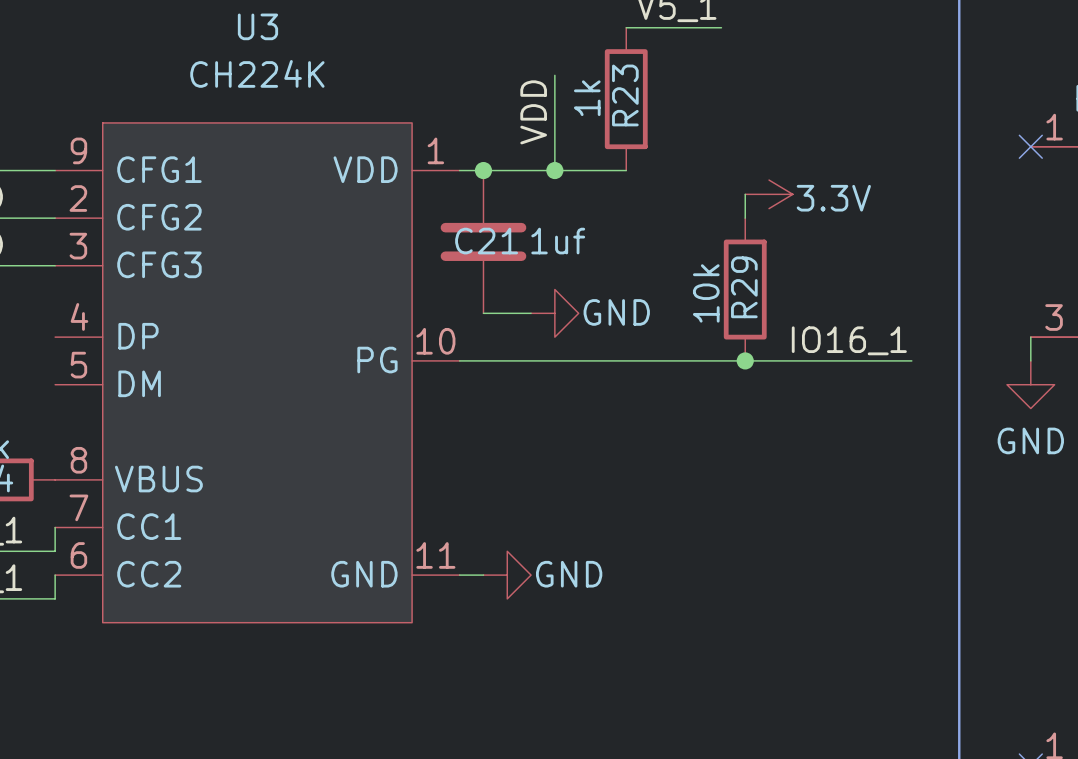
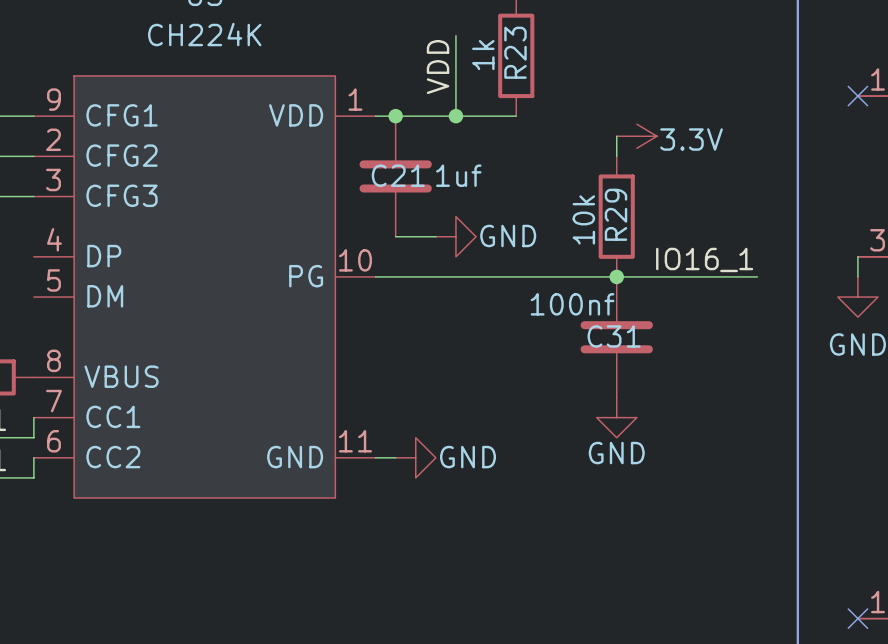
C31: none -> 100nf (616, 337)
power symbol: none -> GND (616, 417)

